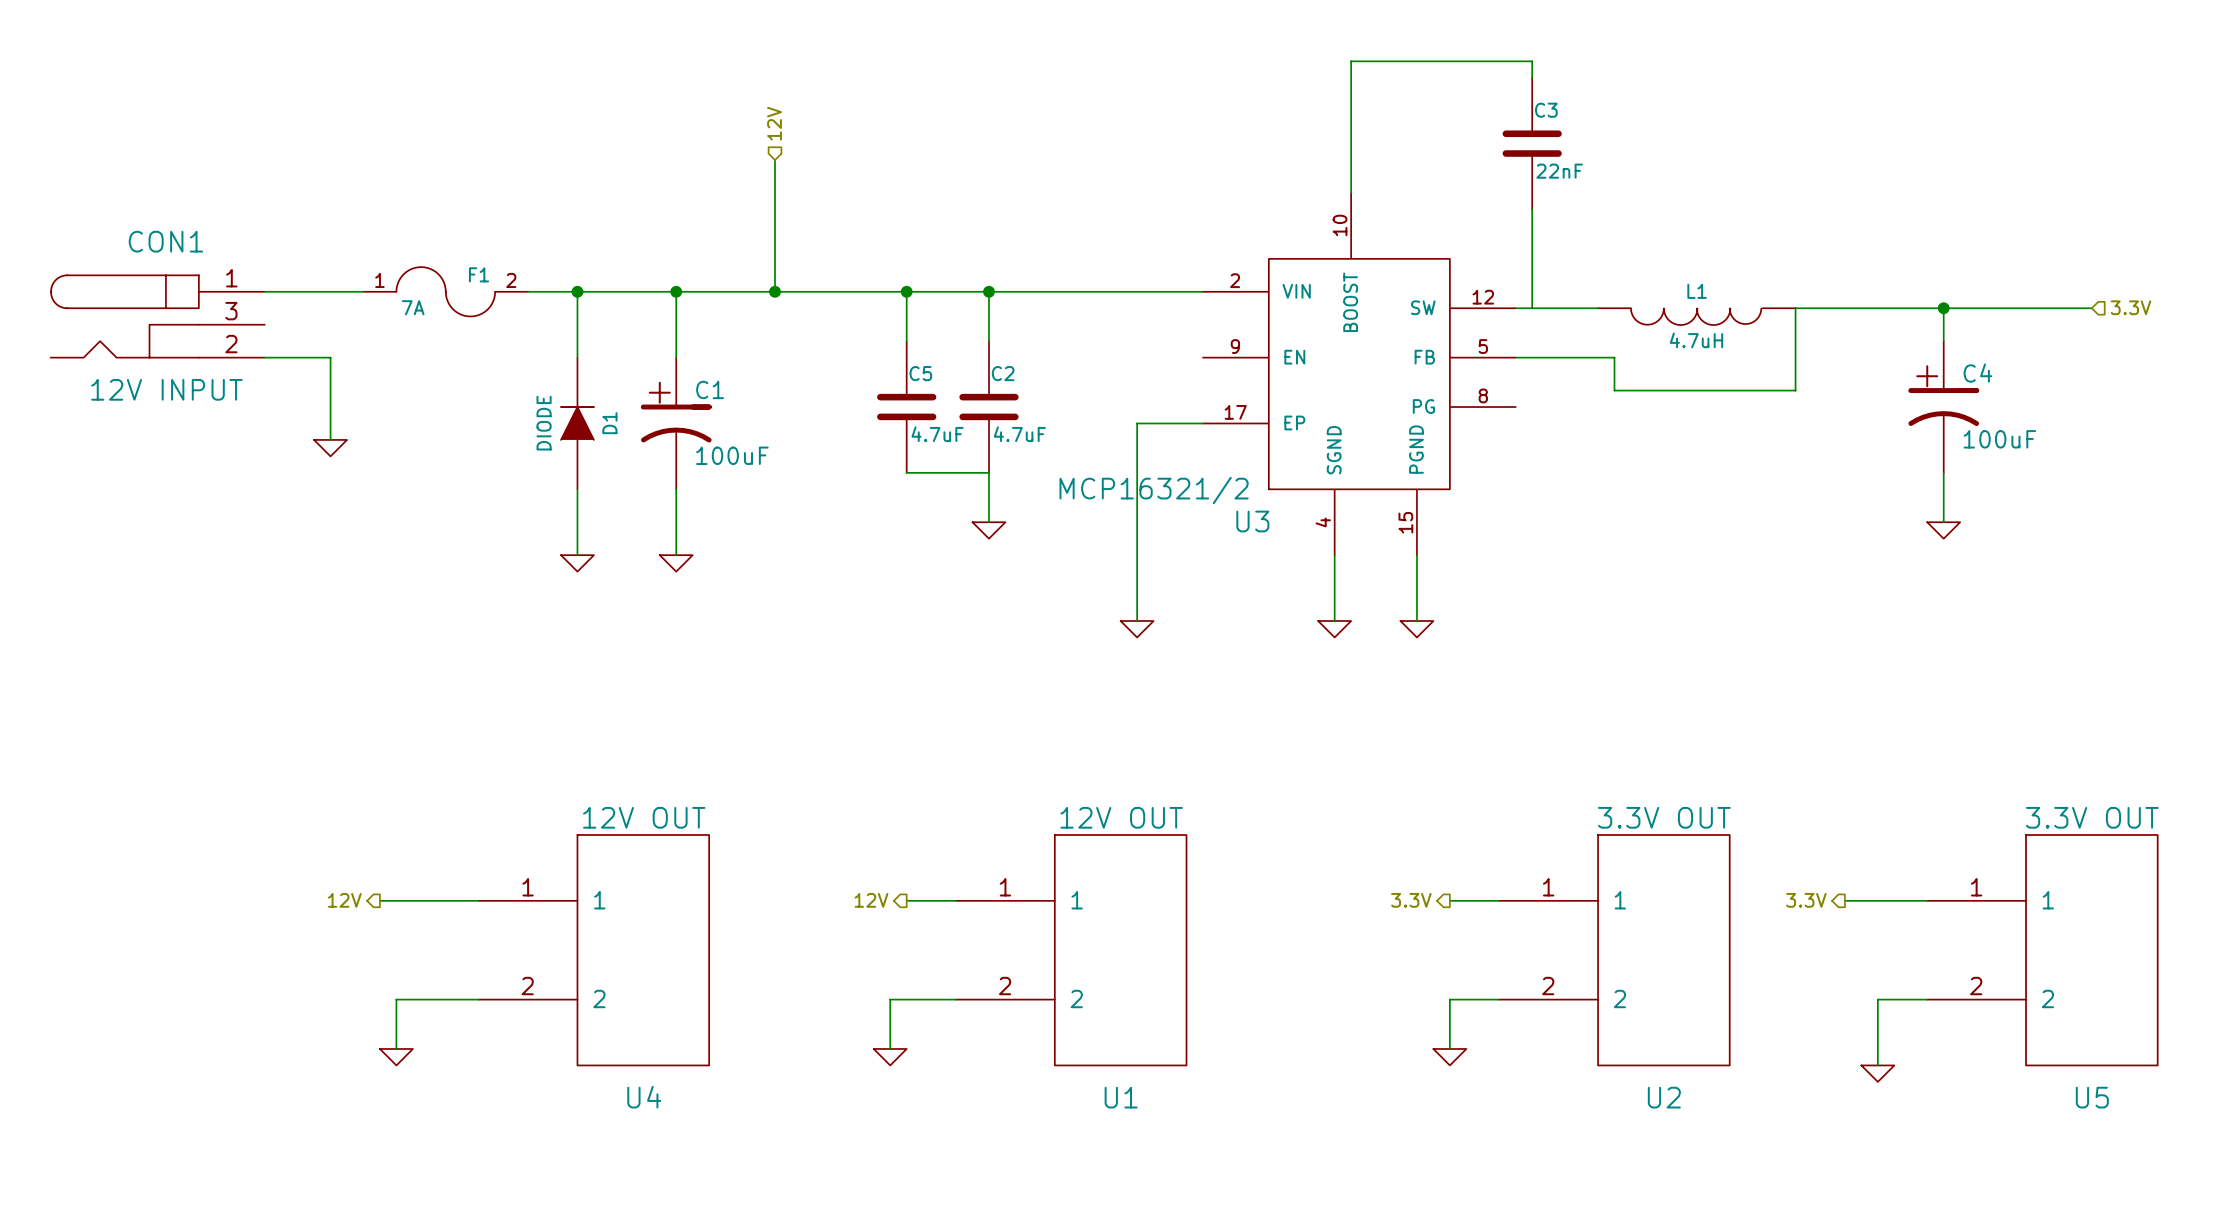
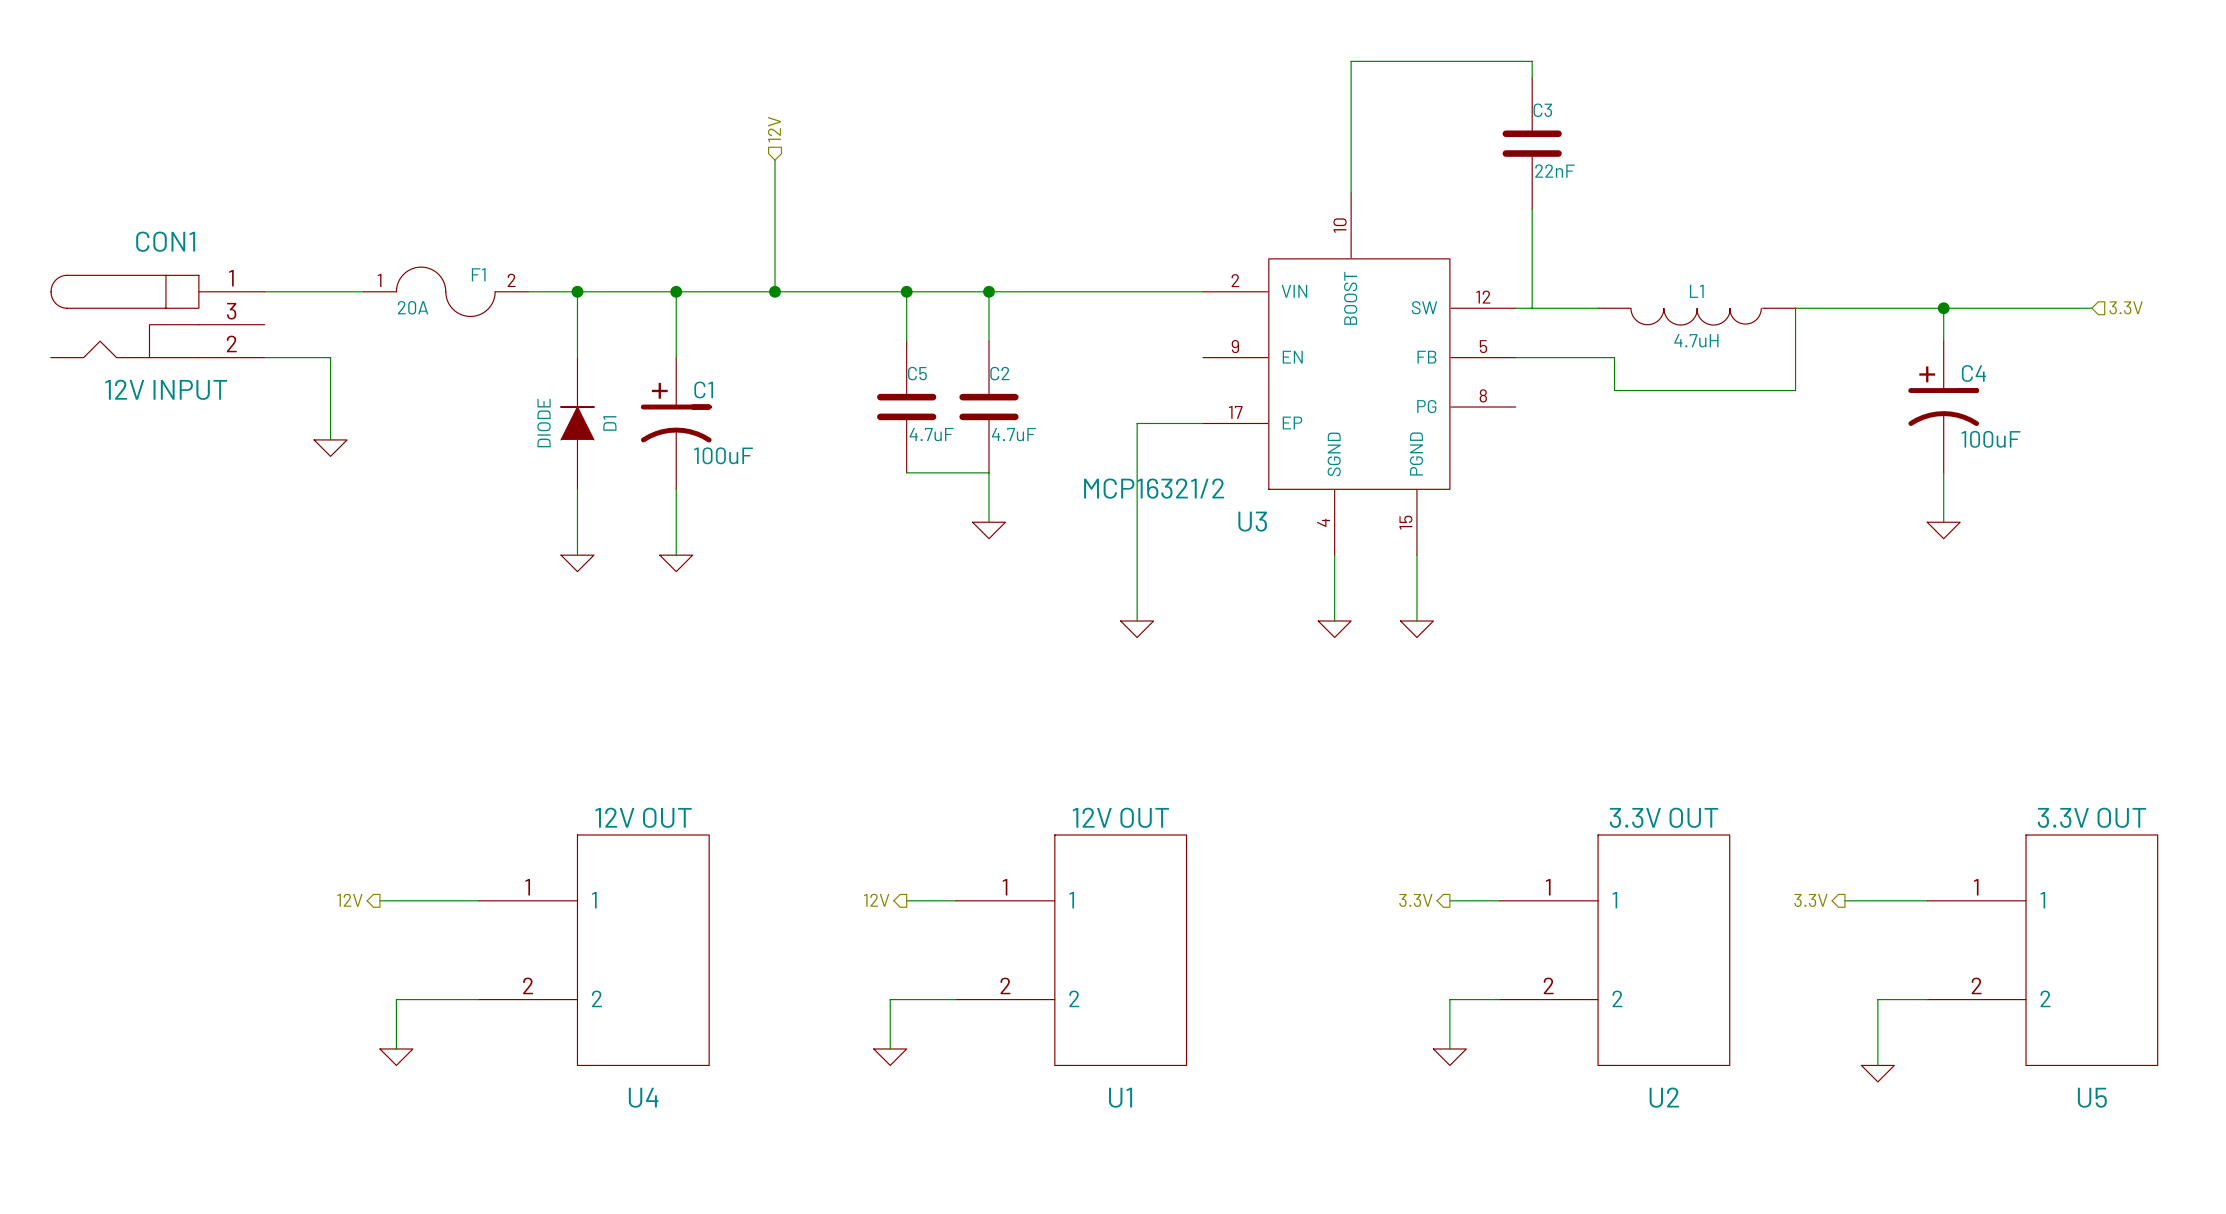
F1 value: 7A (413, 307) -> 20A (413, 307)

